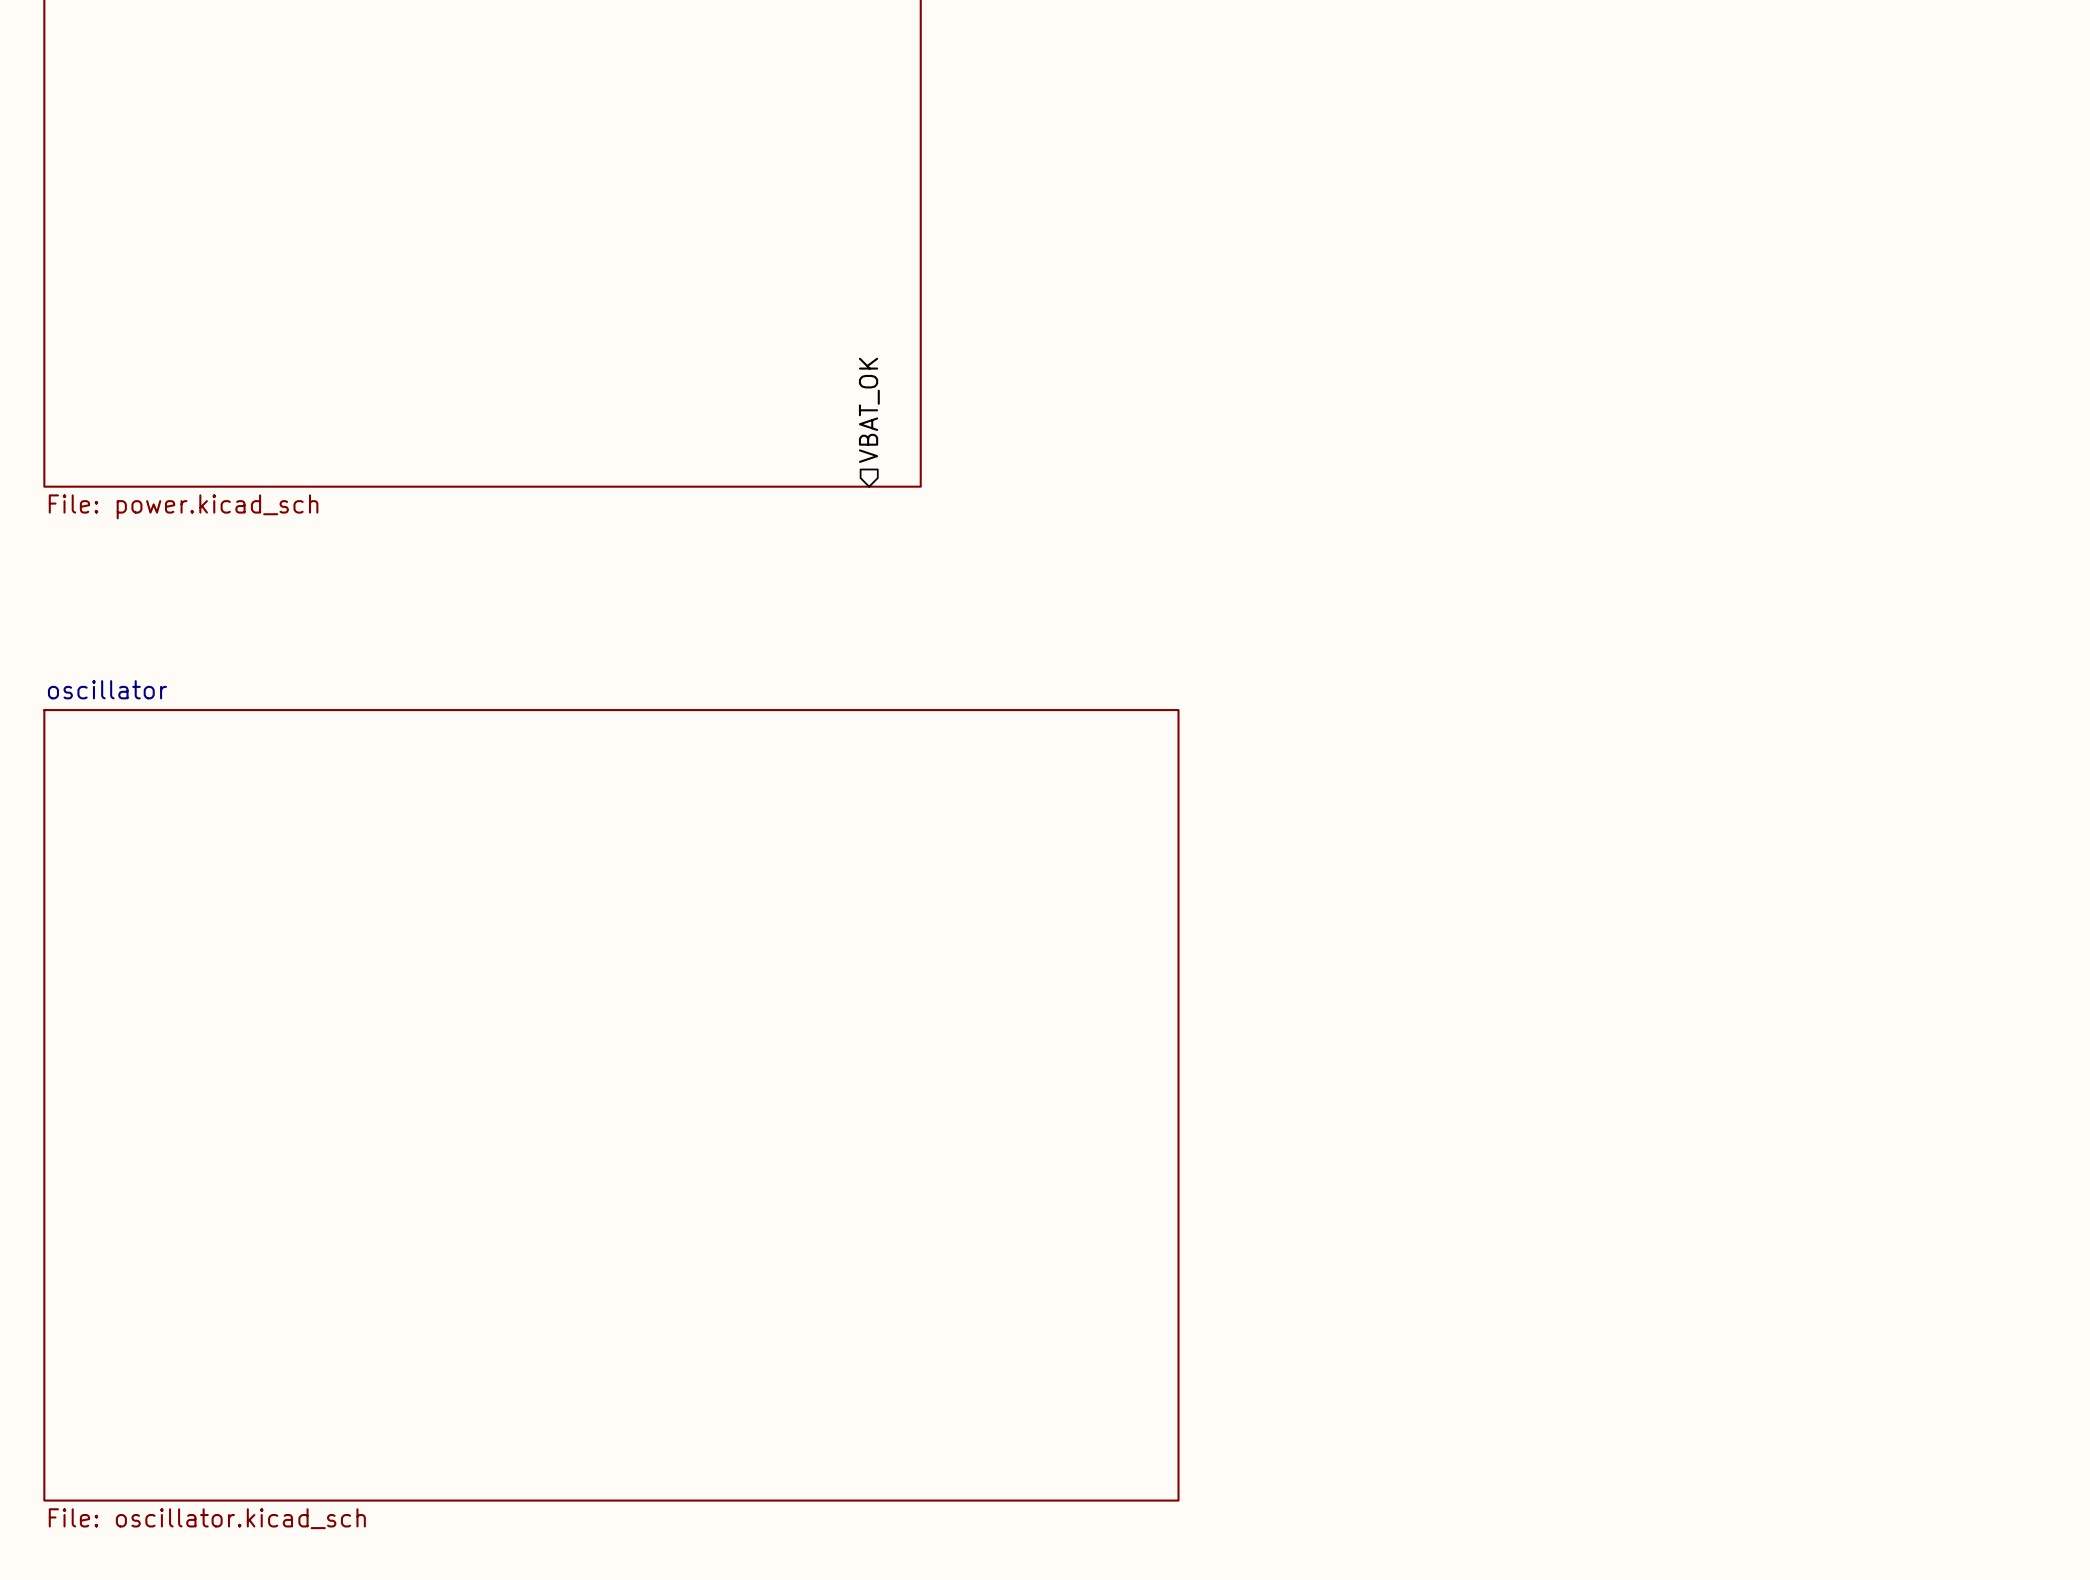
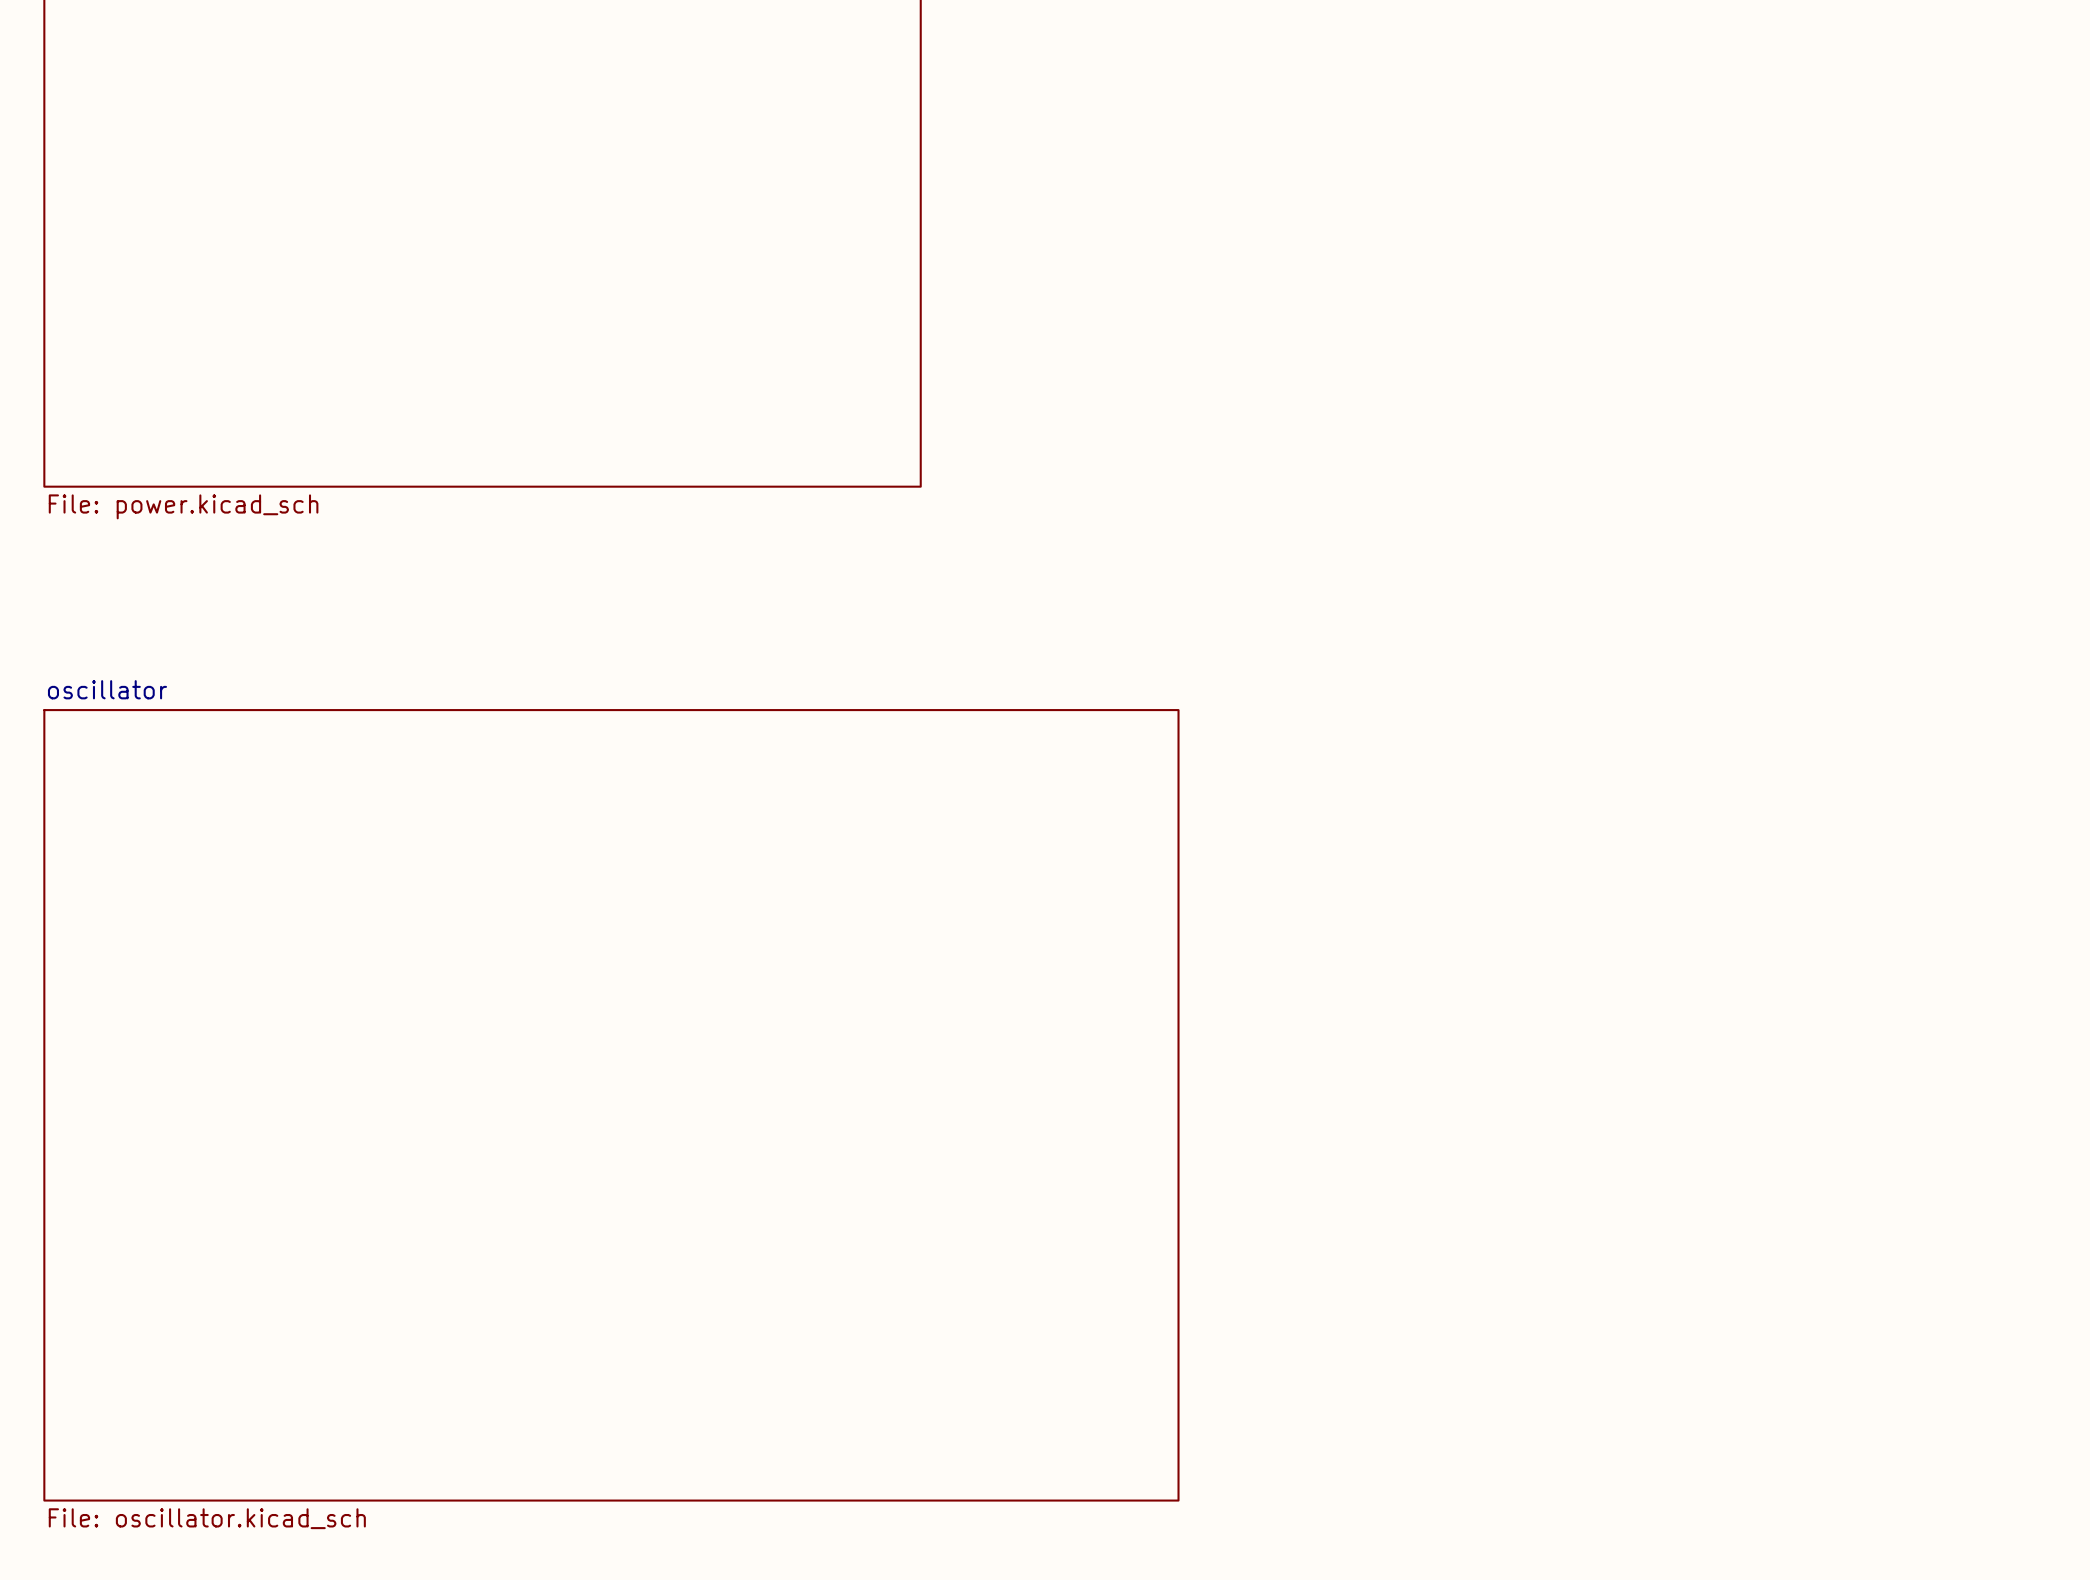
sheet pin: VBAT_OK (869, 410) -> none

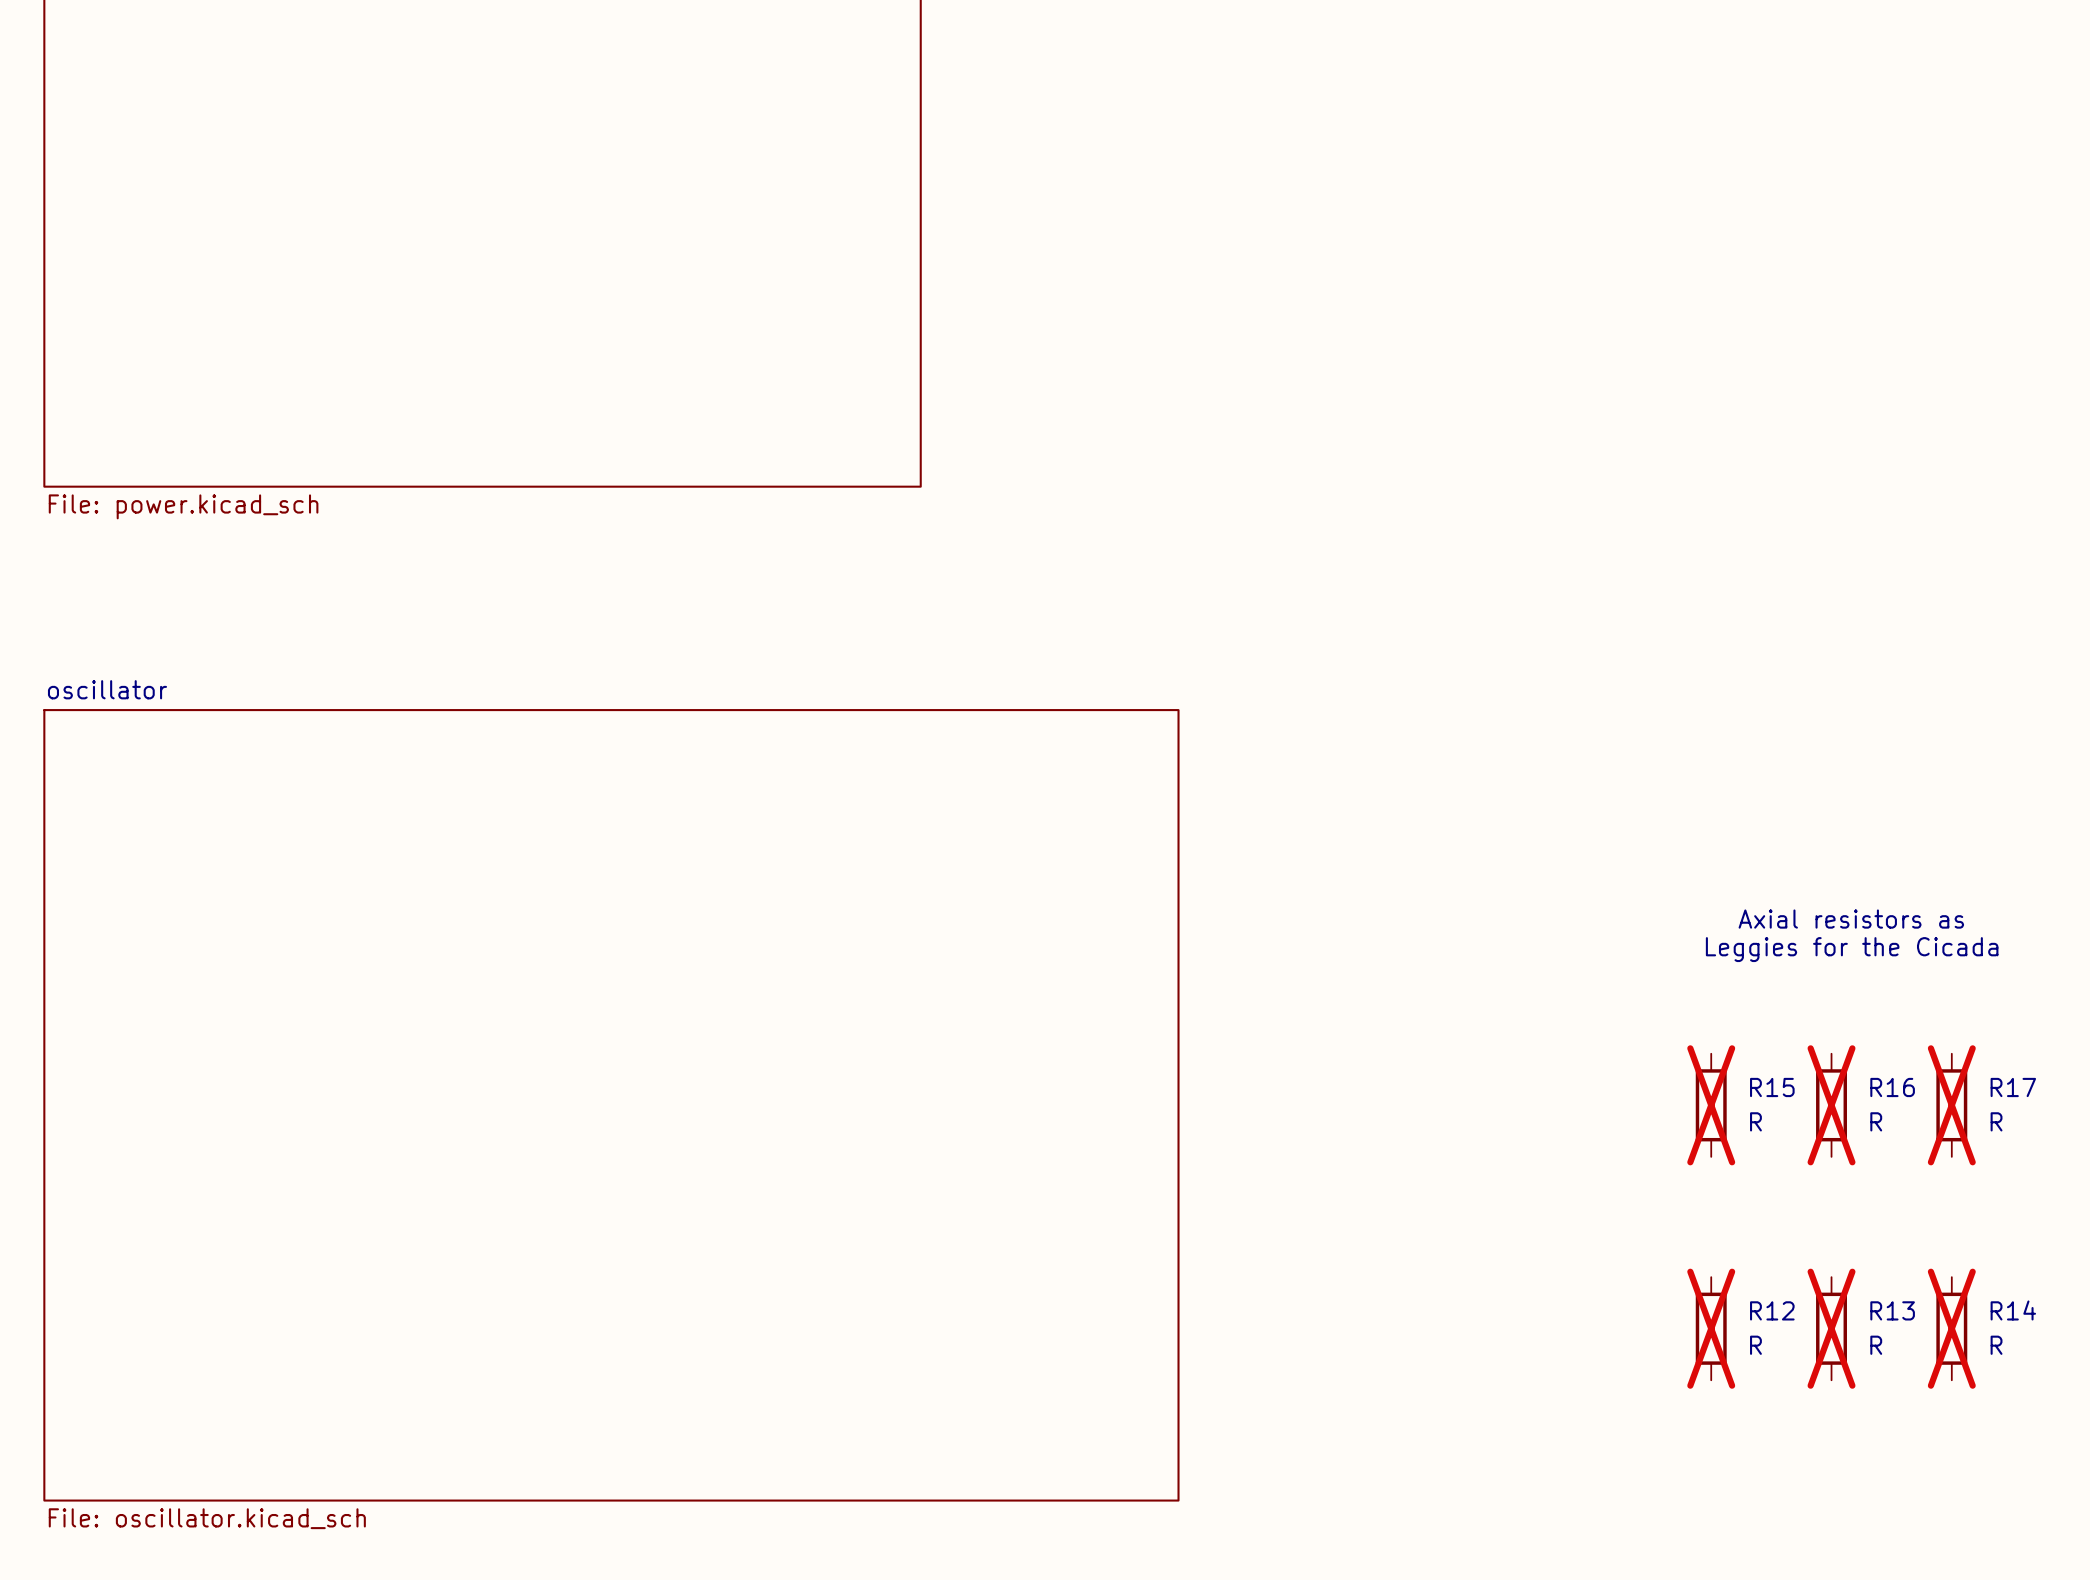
text: none -> Axial resistors as (1851, 919)
text: none -> Leggies for the Cicada (1852, 949)
R15: none -> R (1711, 1105)
R16: none -> R (1831, 1105)
R17: none -> R (1951, 1105)
R12: none -> R (1711, 1328)
R13: none -> R (1831, 1328)
R14: none -> R (1951, 1328)

